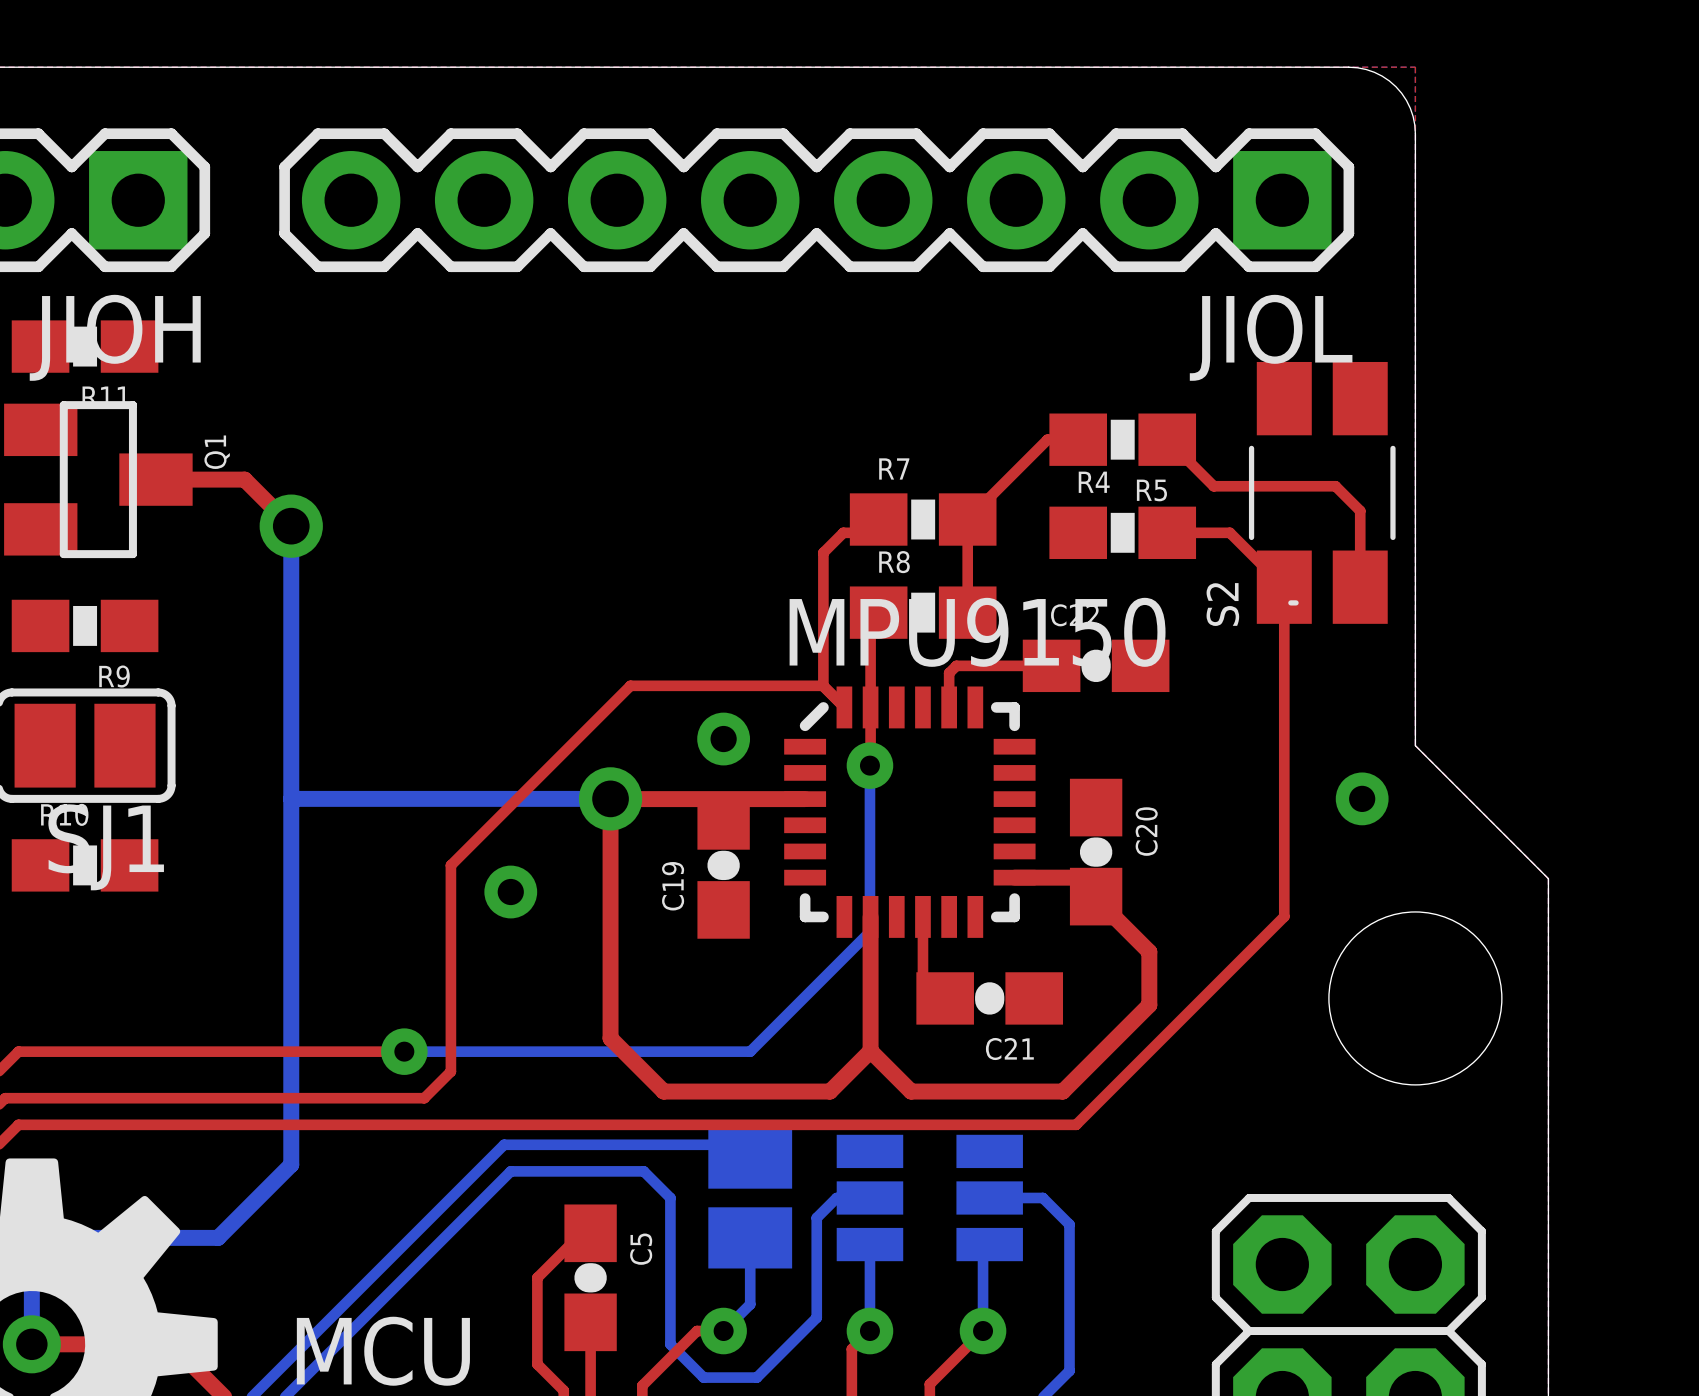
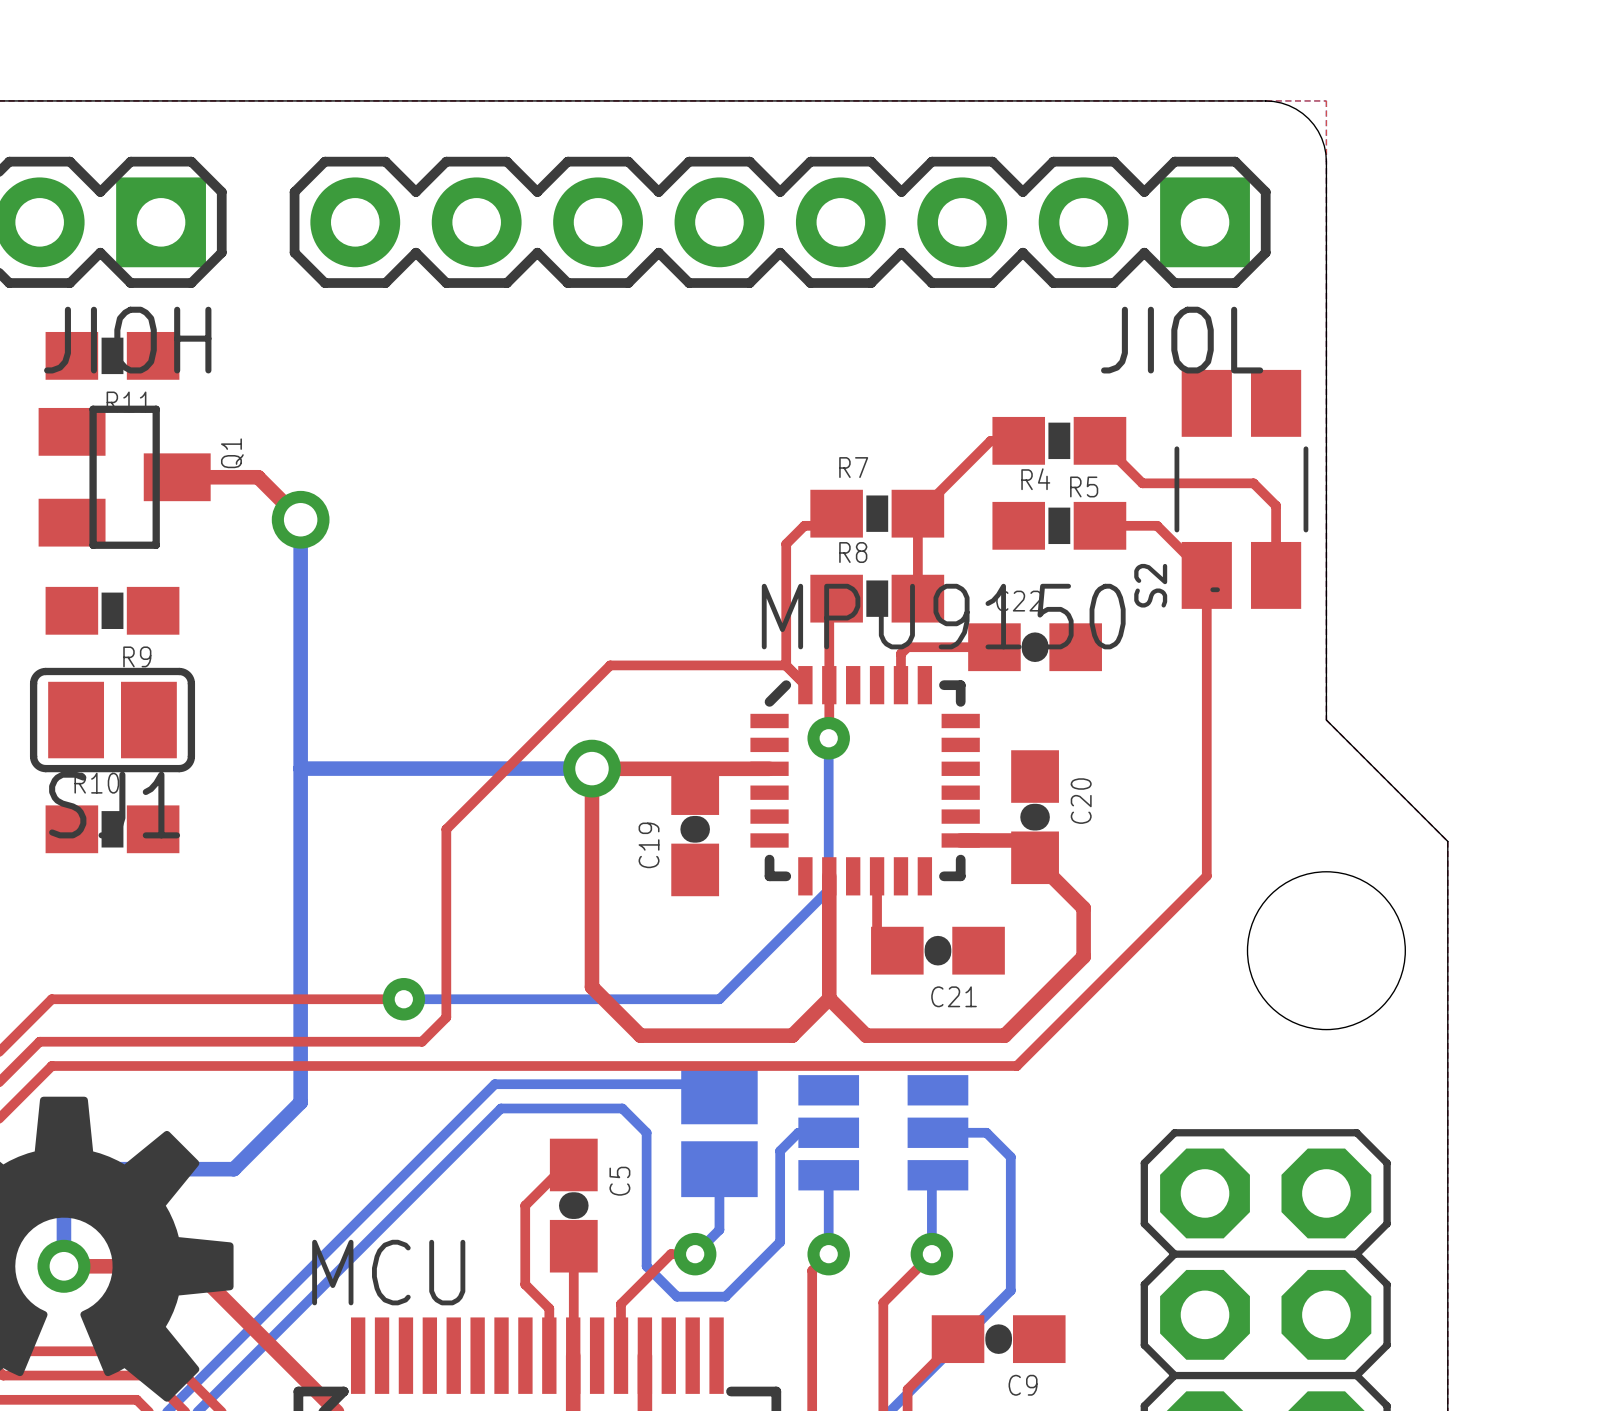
via: (723, 739) -> none
via: (1362, 798) -> none
via: (510, 892) -> none

